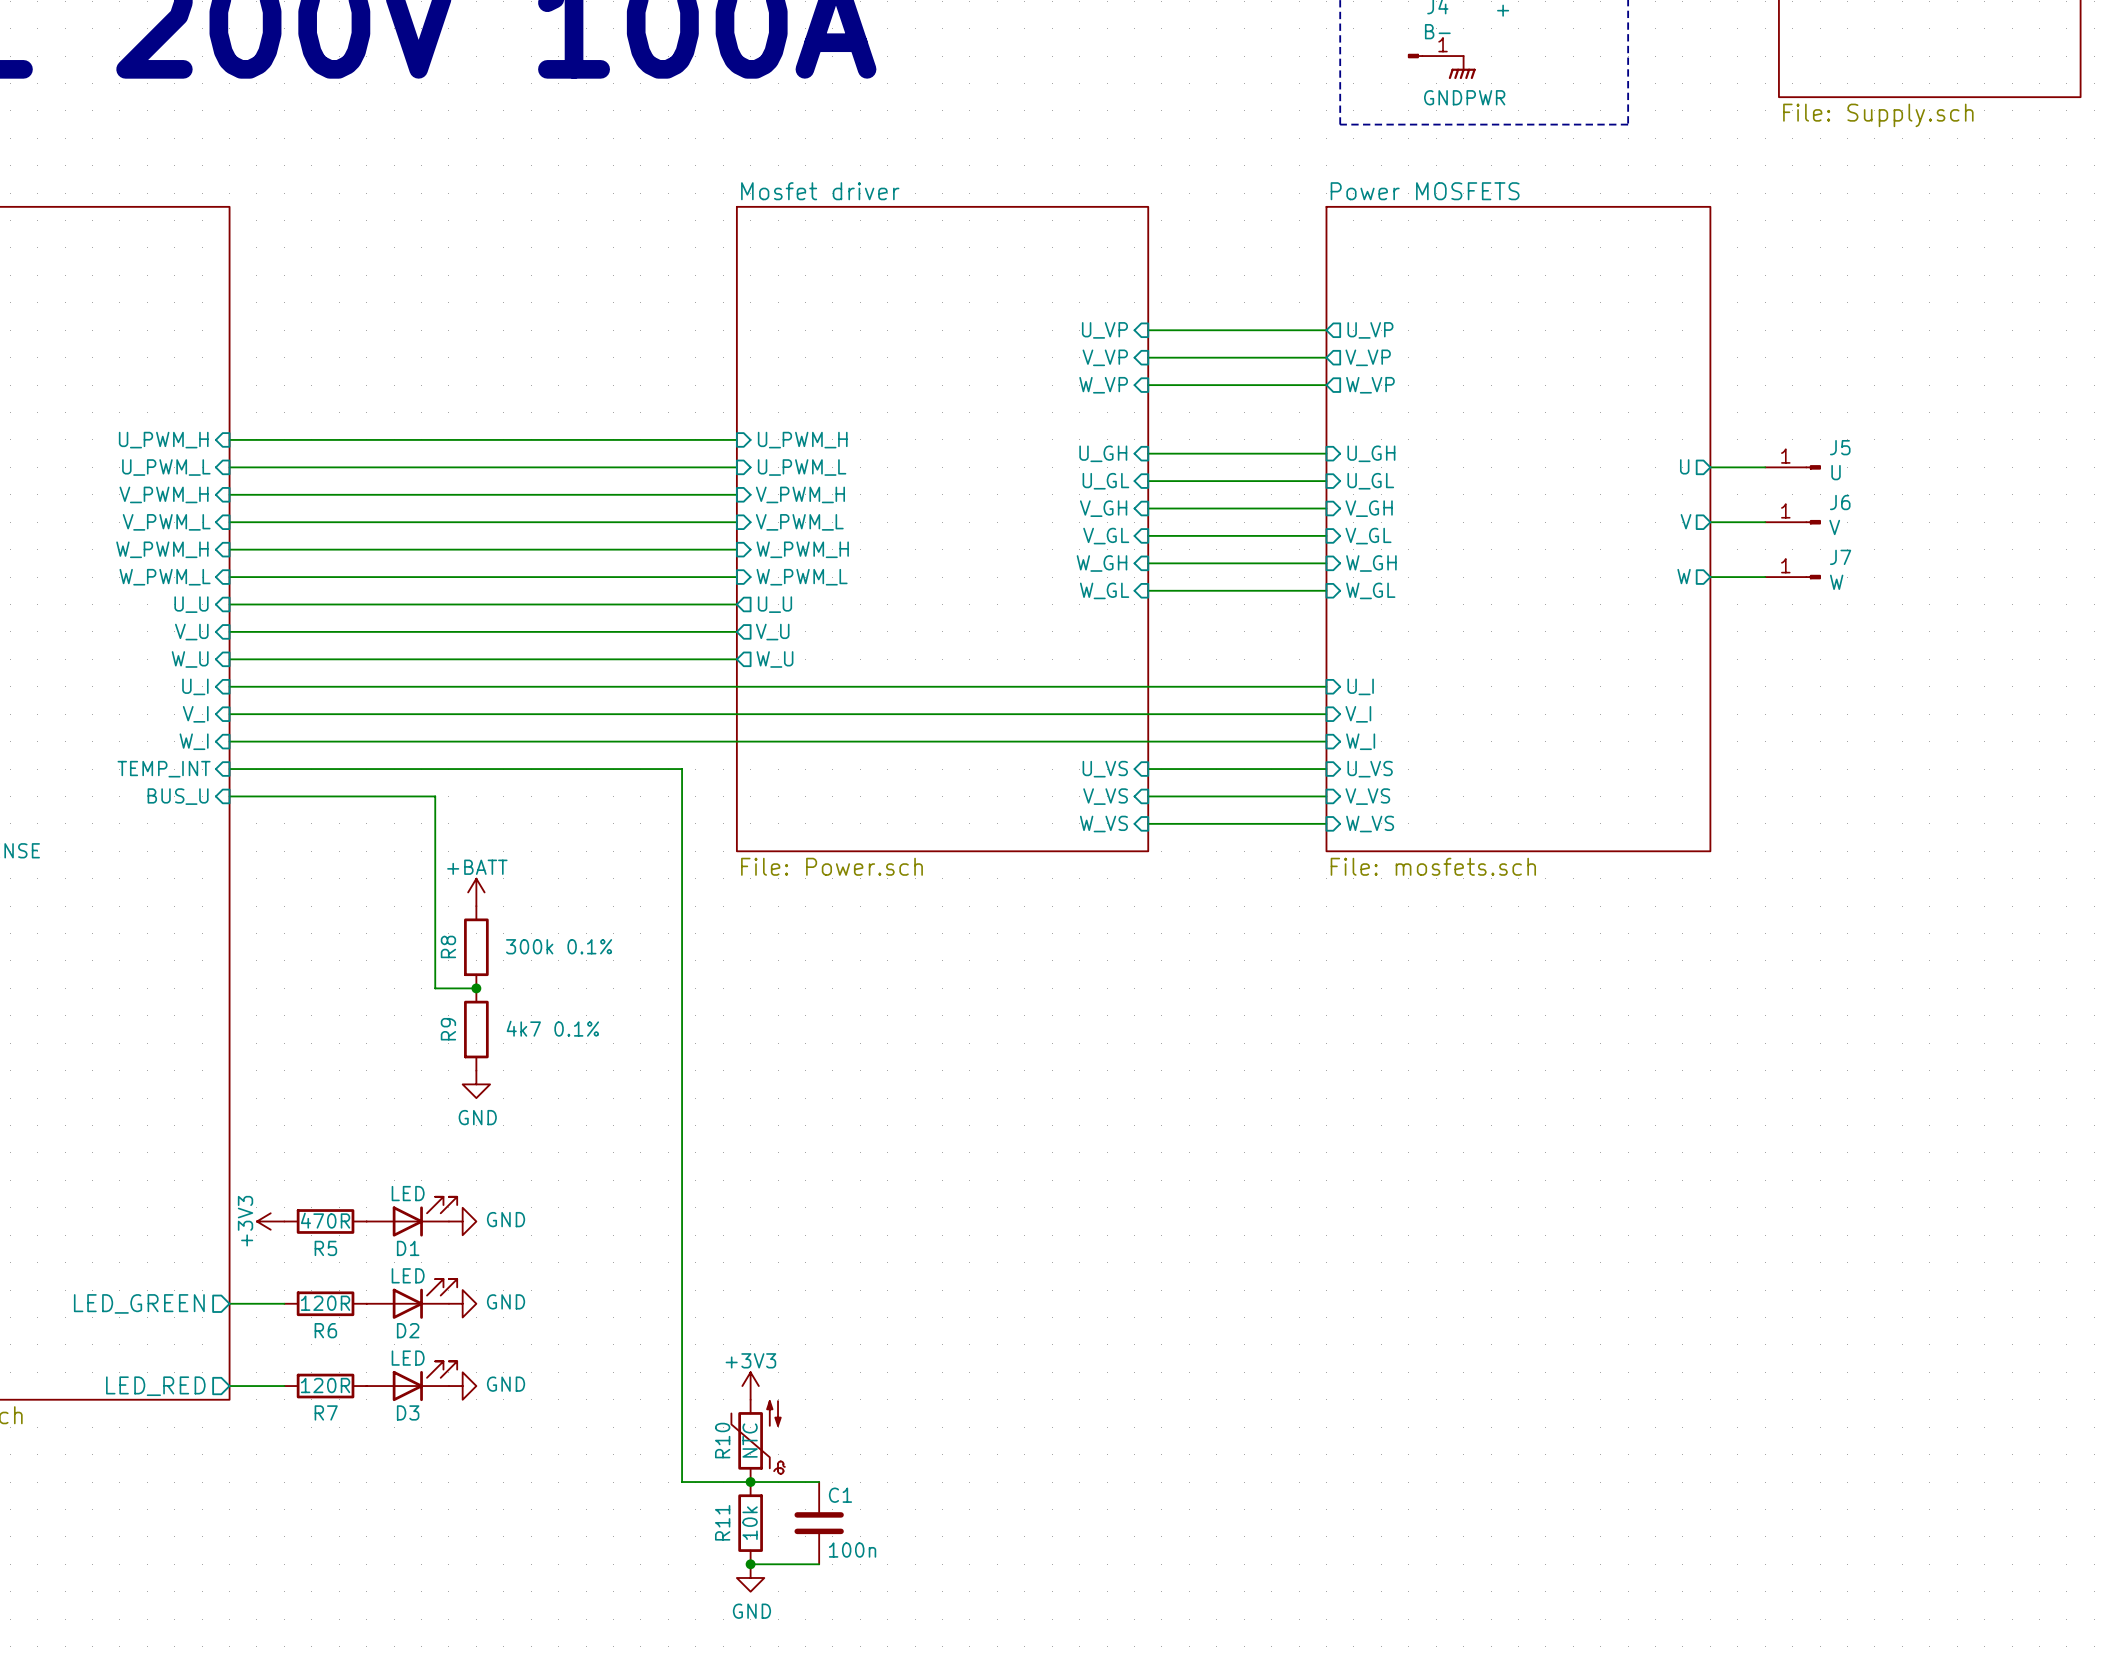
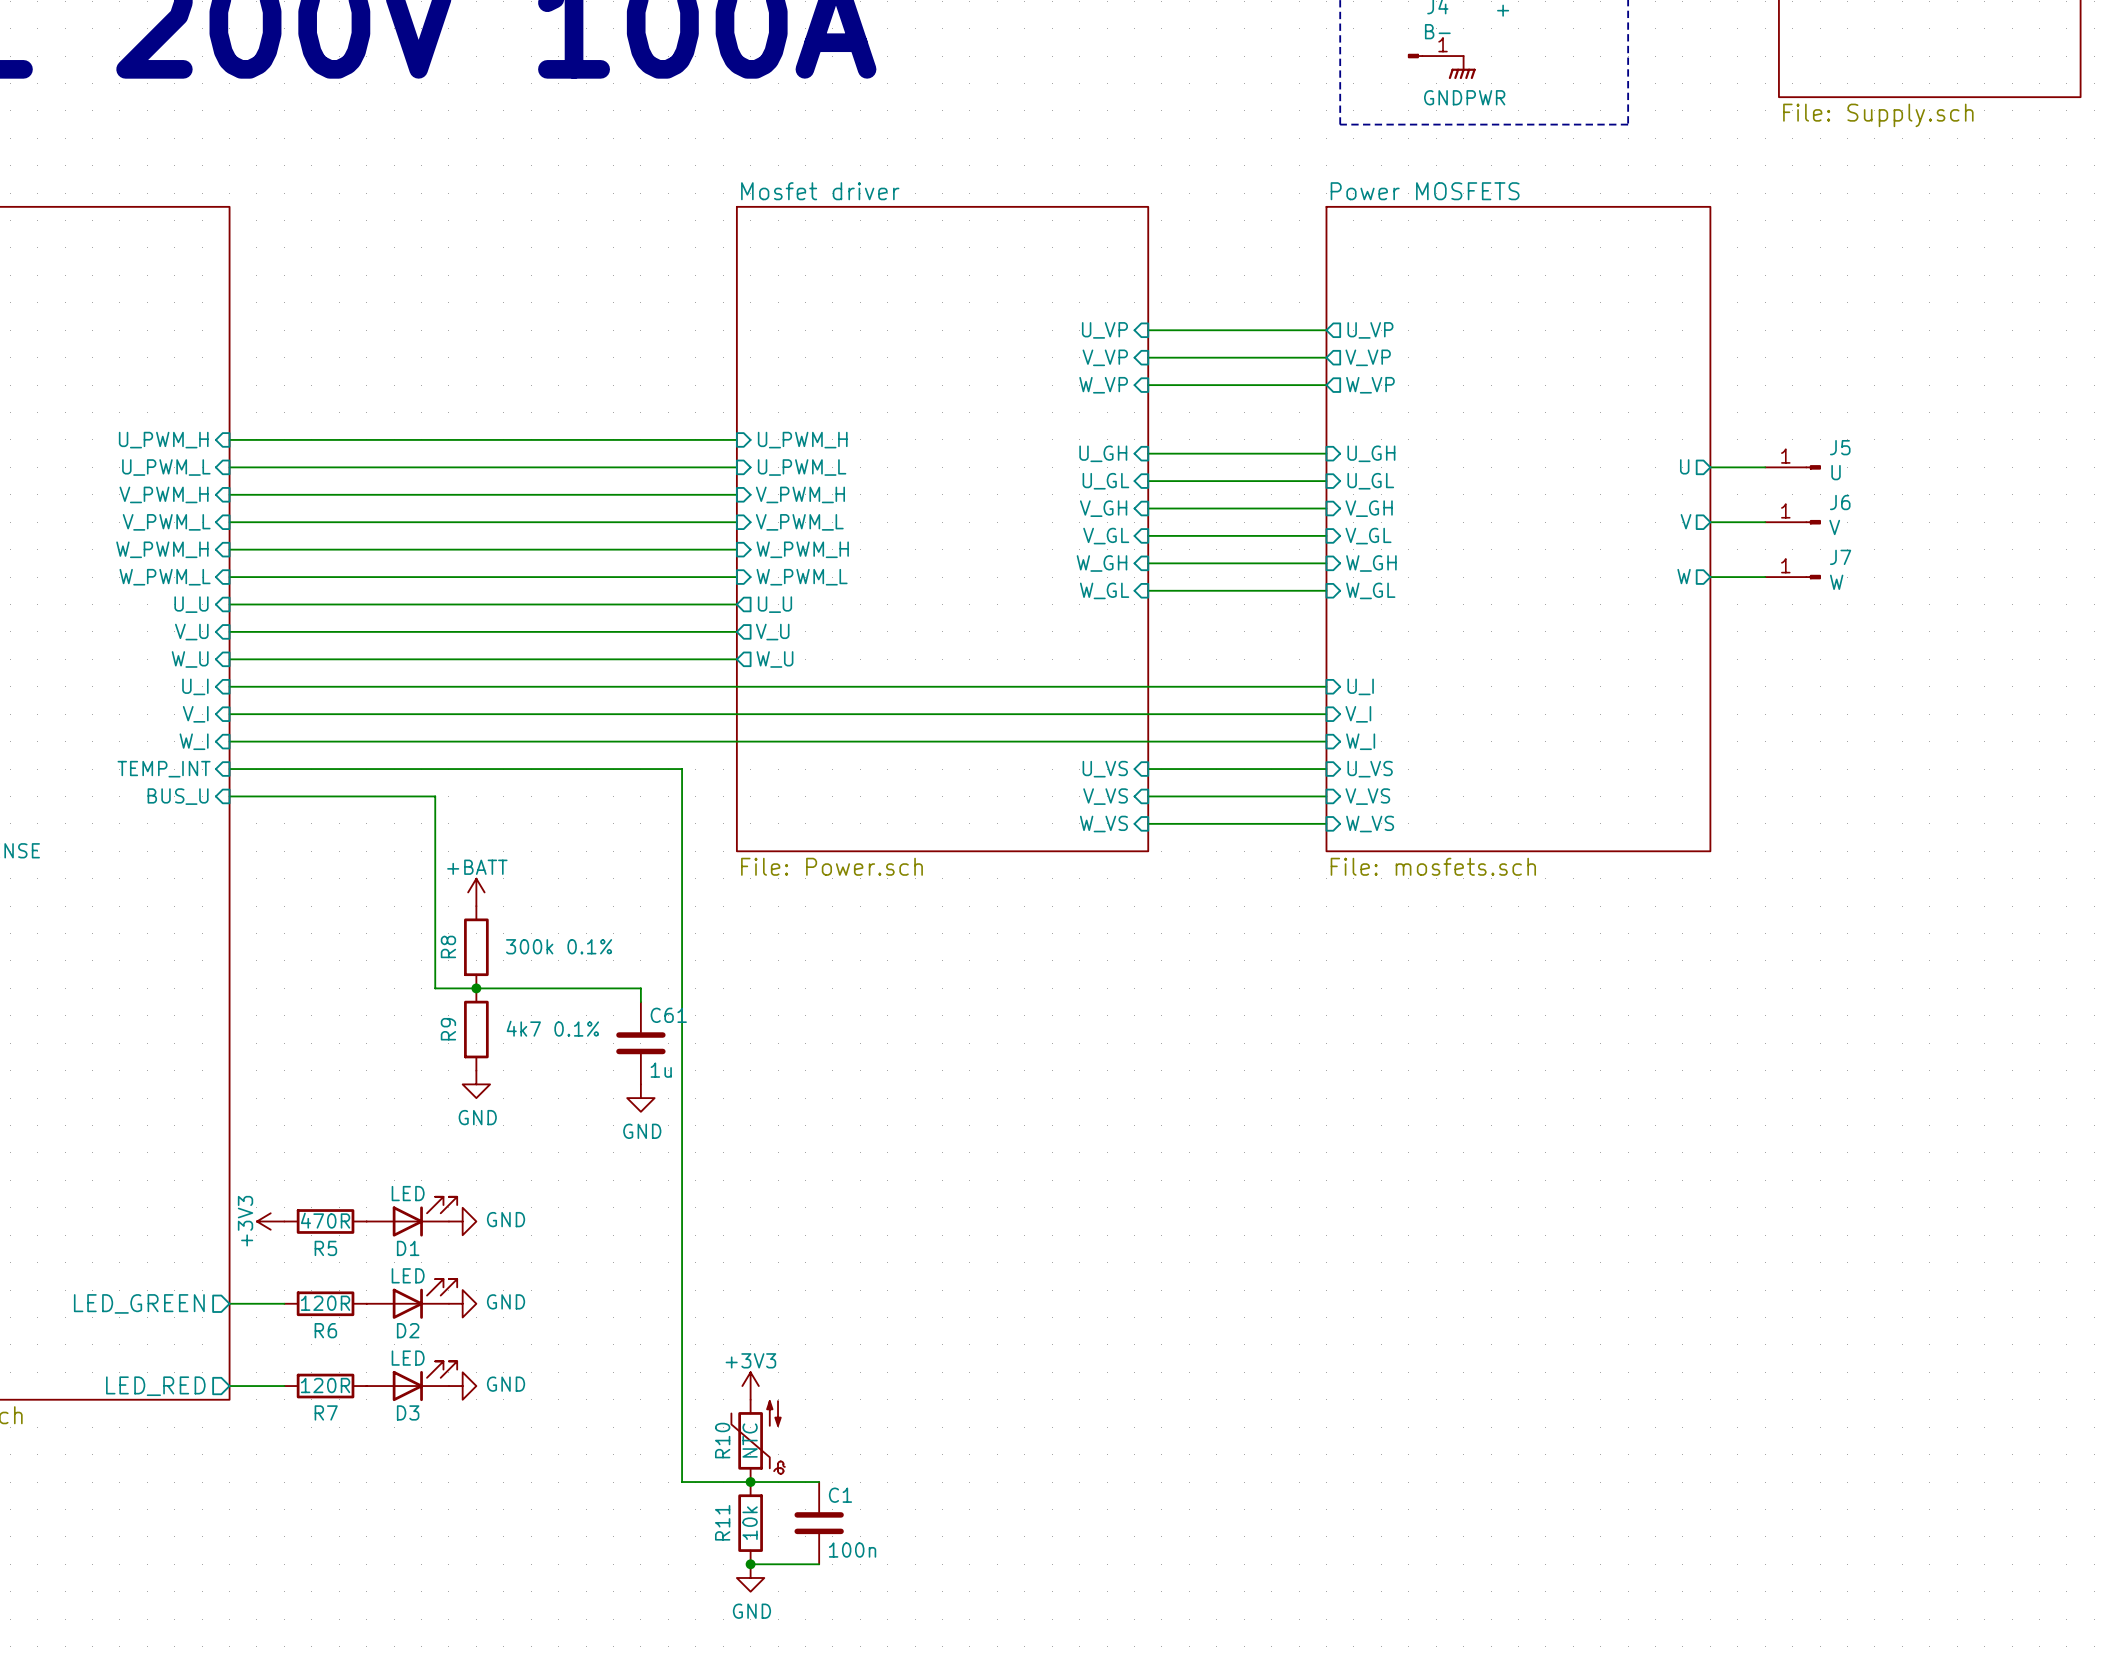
wire: none -> (476, 988) (640, 988) (640, 1002)
C61: none -> 1u (640, 1043)
power symbol: none -> GND (640, 1098)

